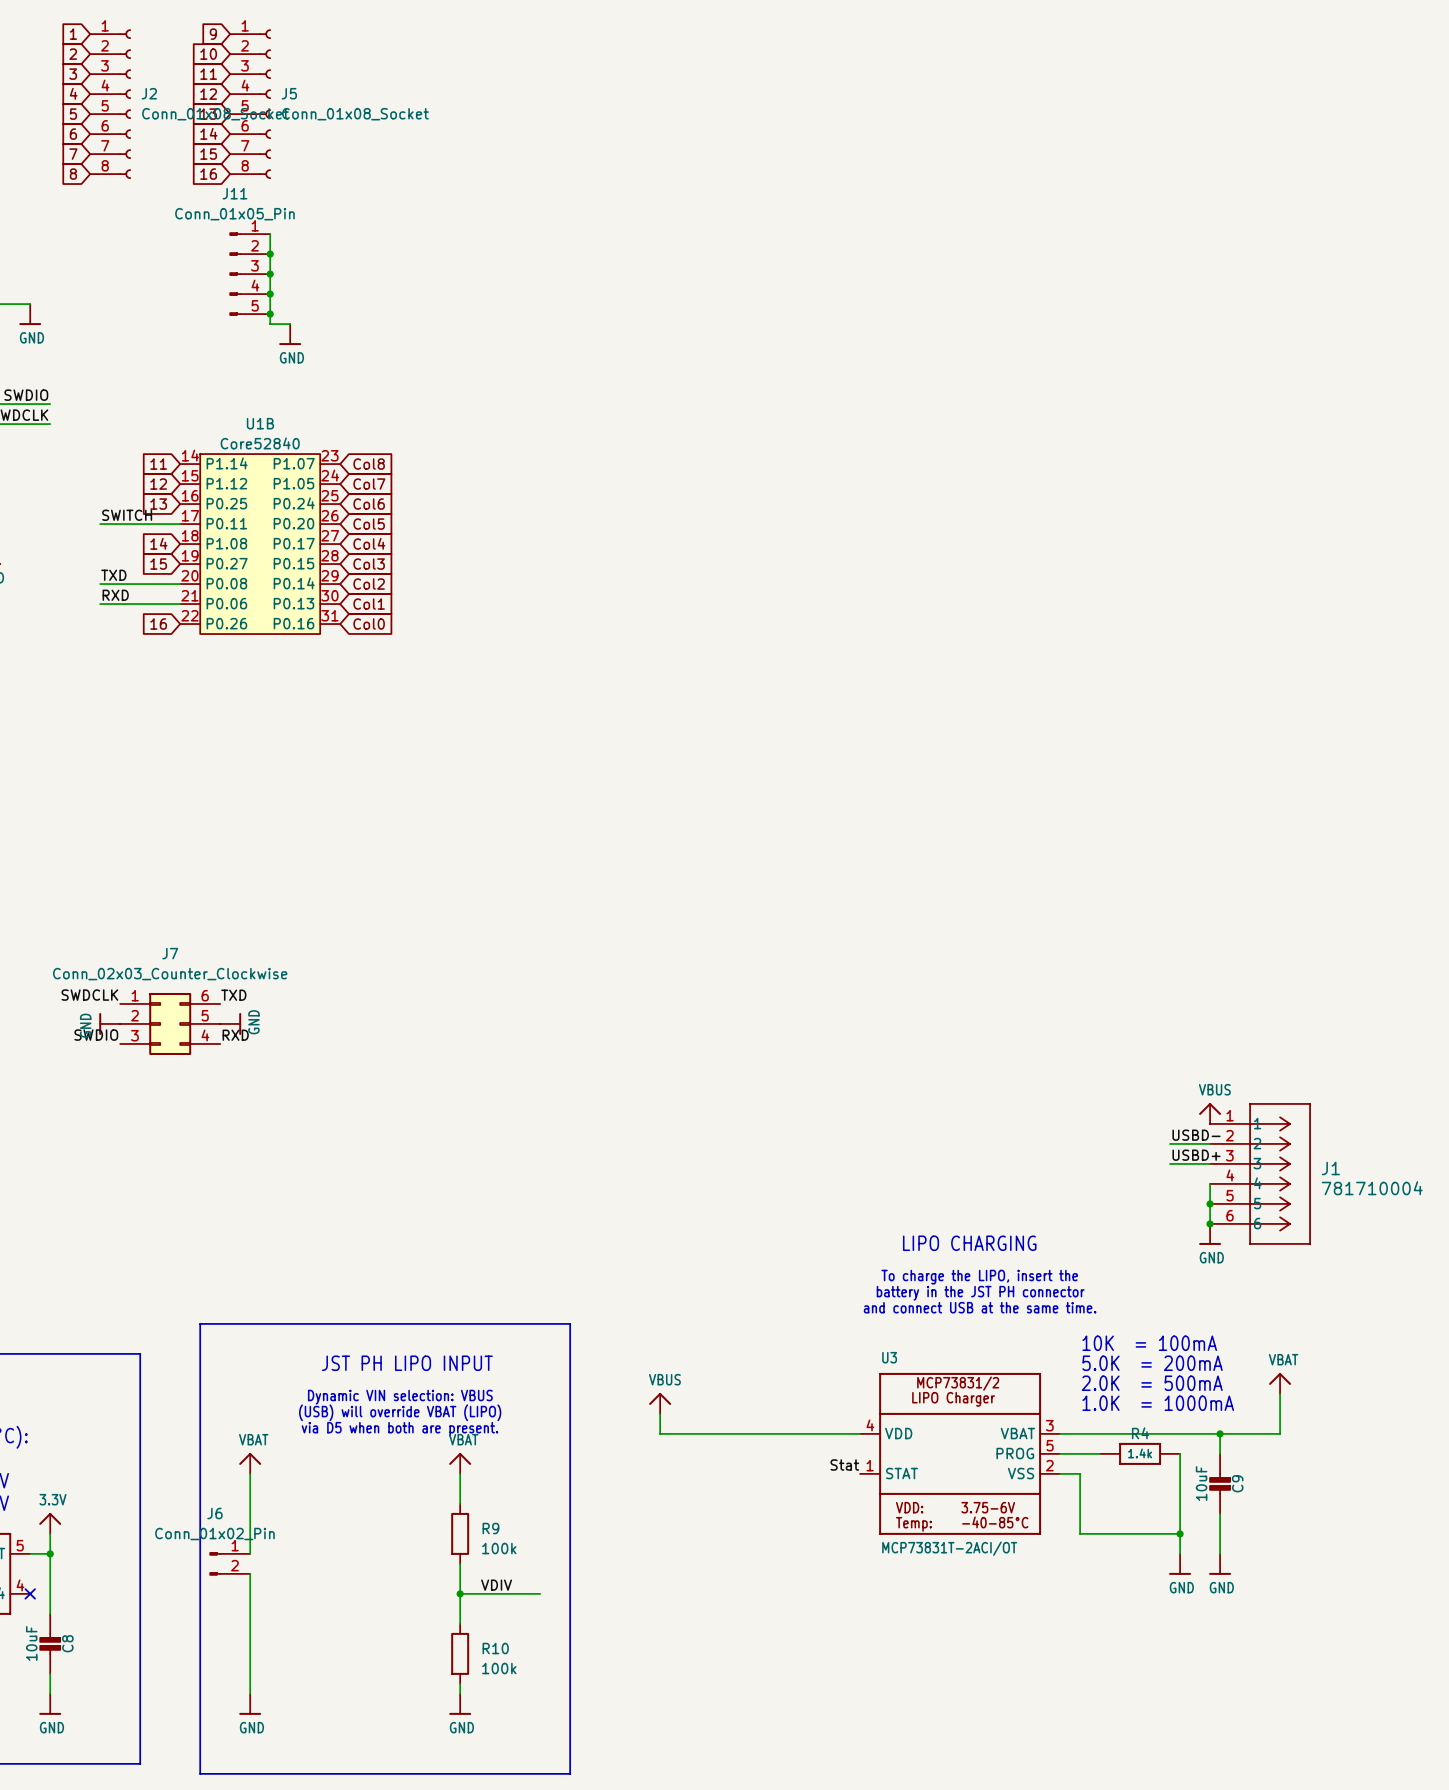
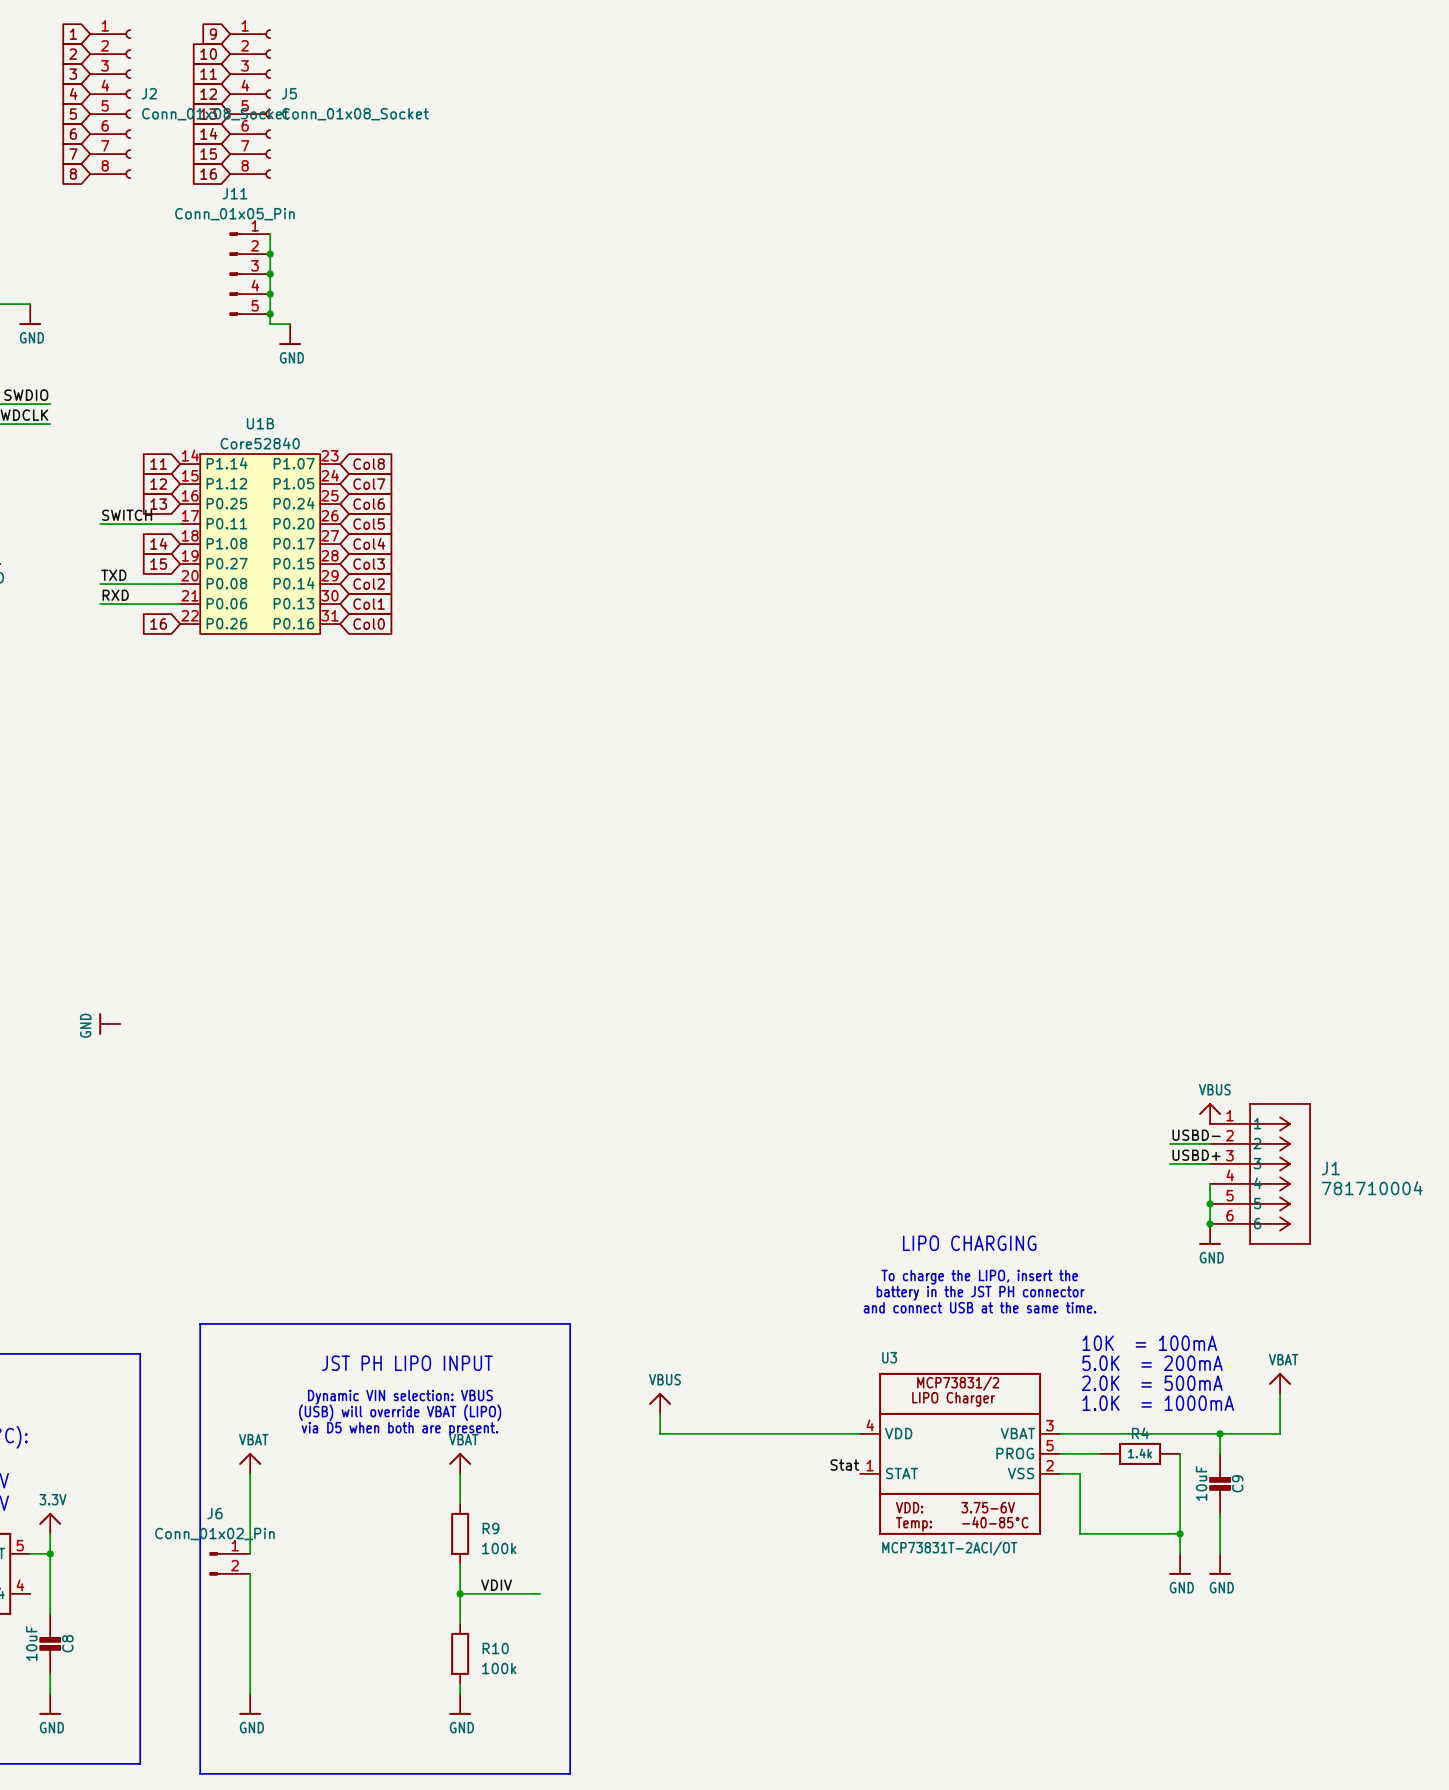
label: SWDCLK (89, 995) -> none
label: TXD (233, 995) -> none
J7: Conn_02x03_Counter_Clockwise (170, 1023) -> none
power symbol: GND (230, 1023) -> none
label: SWDIO (96, 1035) -> none
label: RXD (235, 1035) -> none
no-connect mark: (30, 1593) -> none

